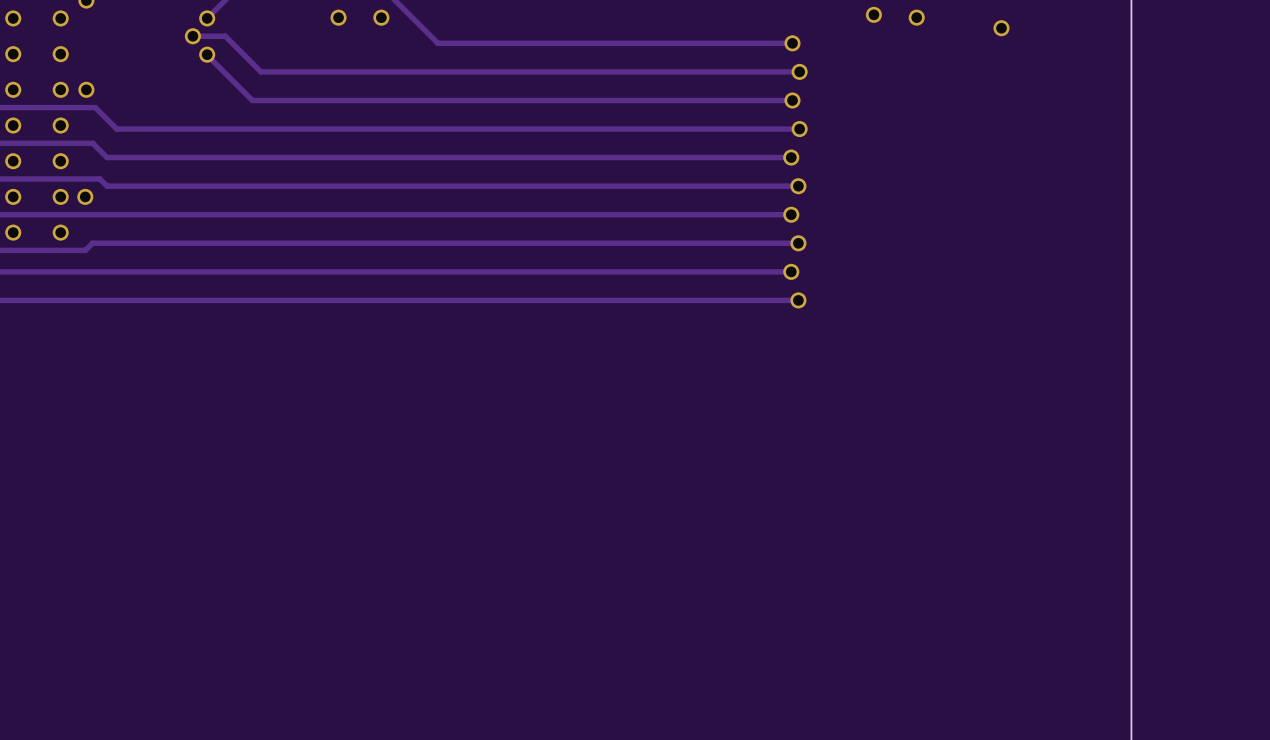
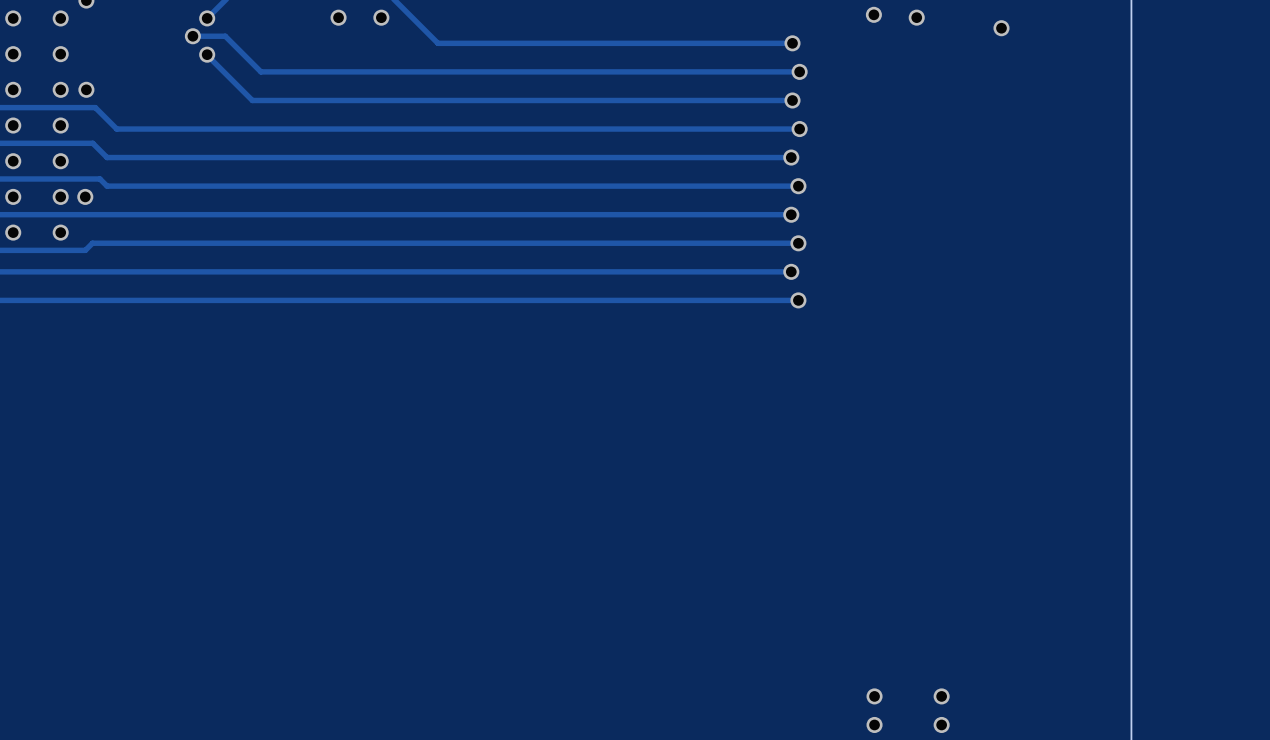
via: none -> (874, 696)
via: none -> (941, 696)
via: none -> (874, 724)
via: none -> (941, 724)

